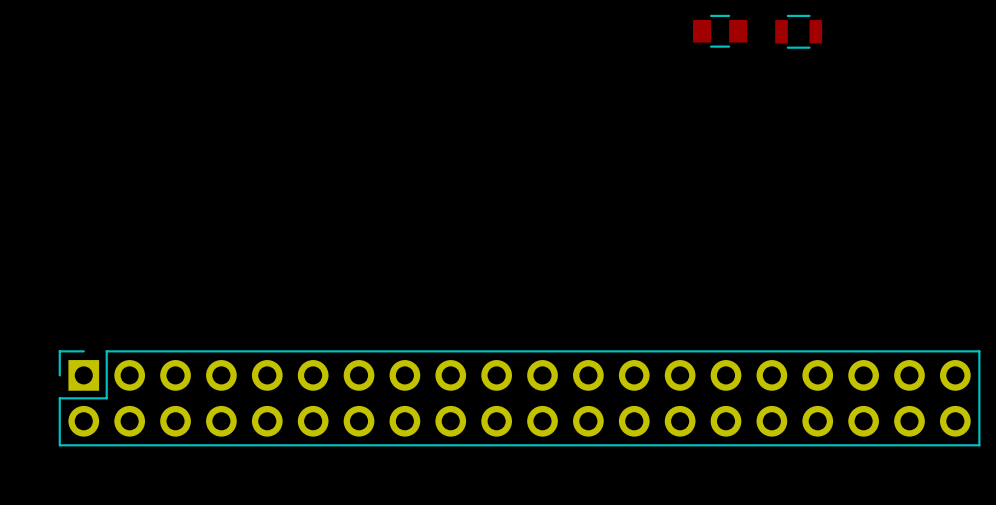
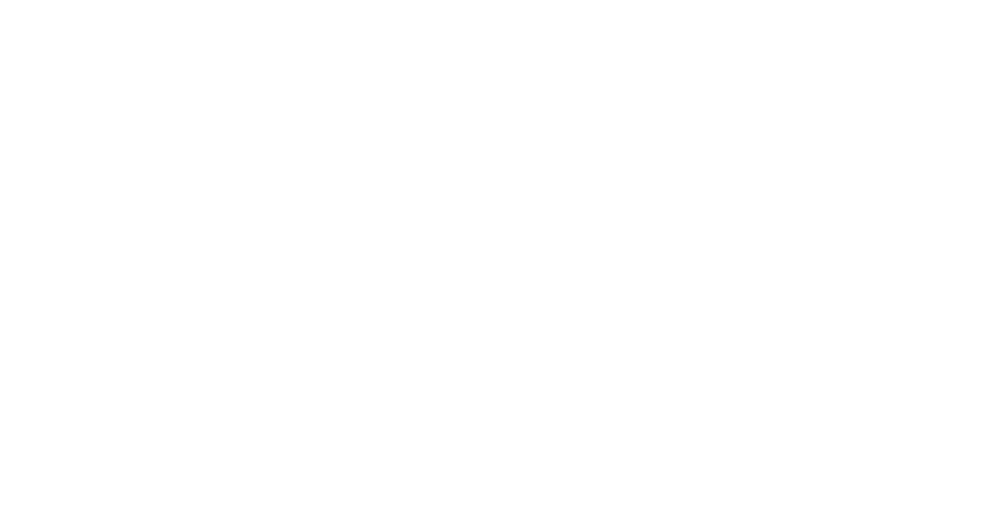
part: (720, 31) -> none
part: (798, 31) -> none
part: (519, 398) -> none

